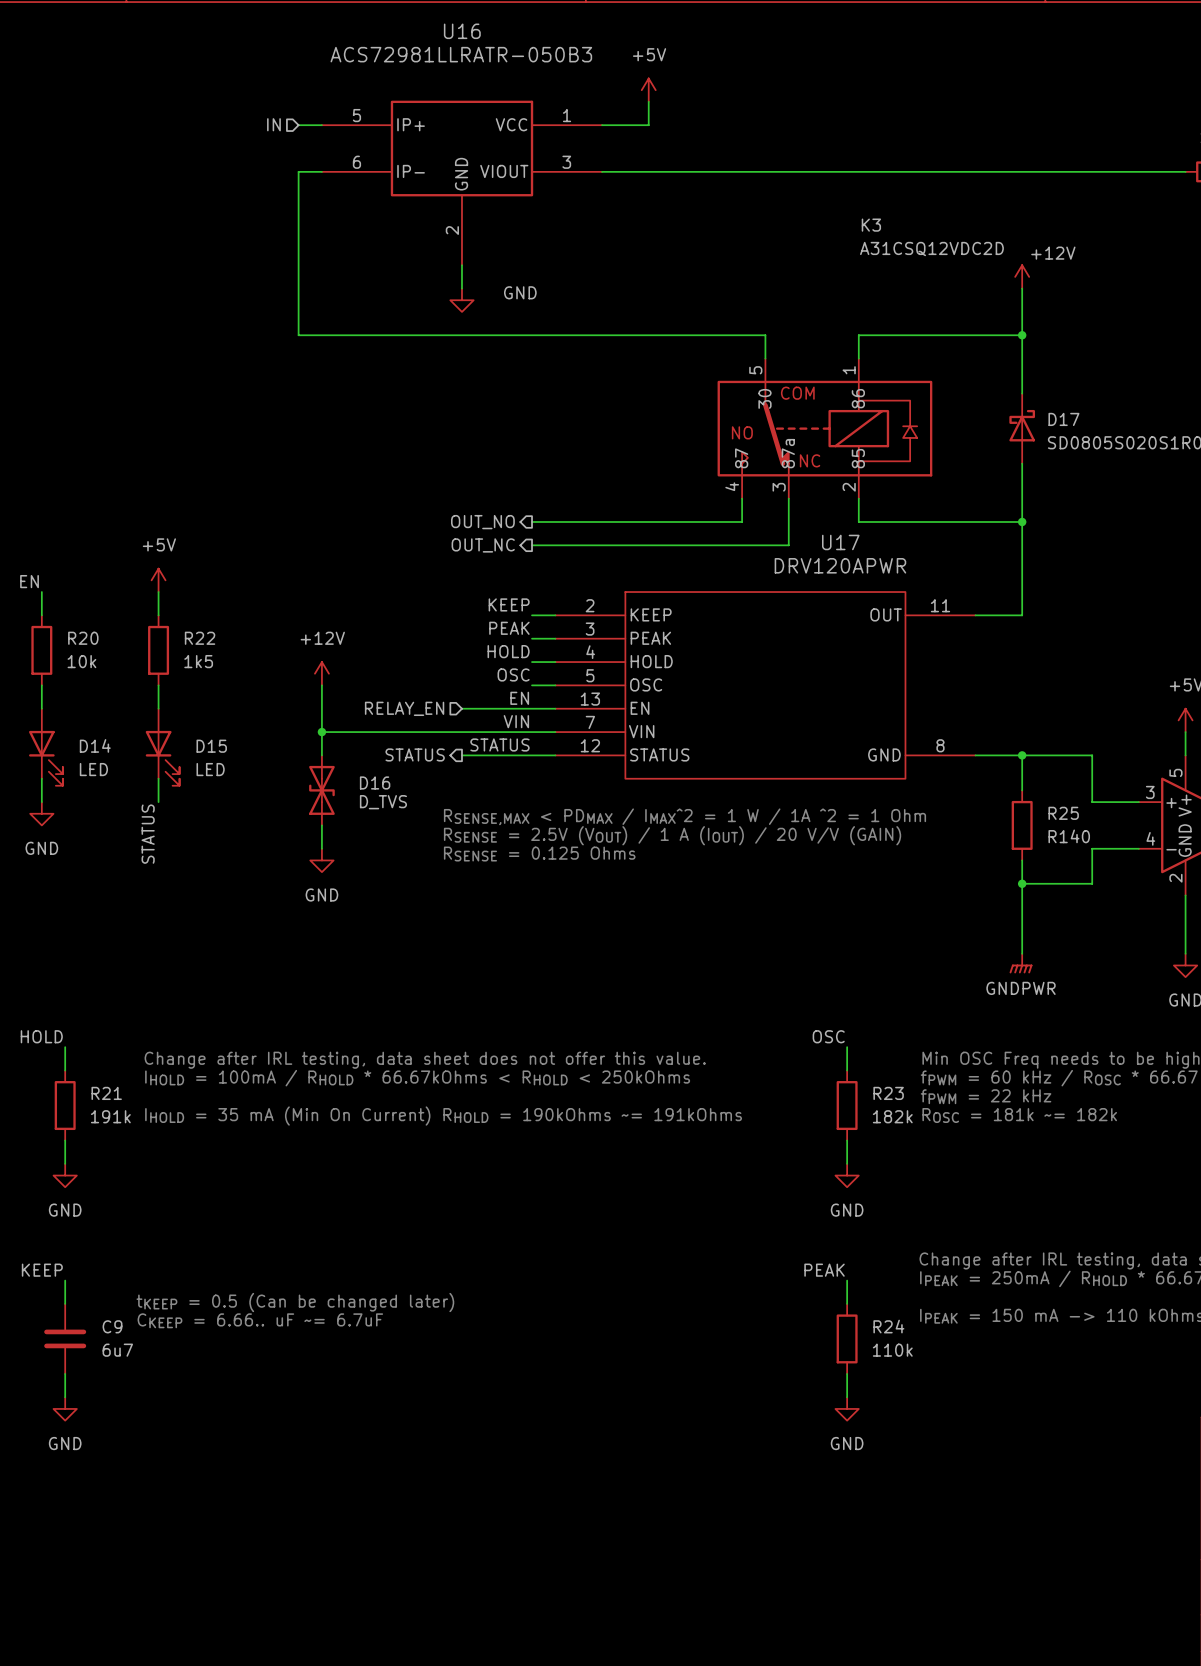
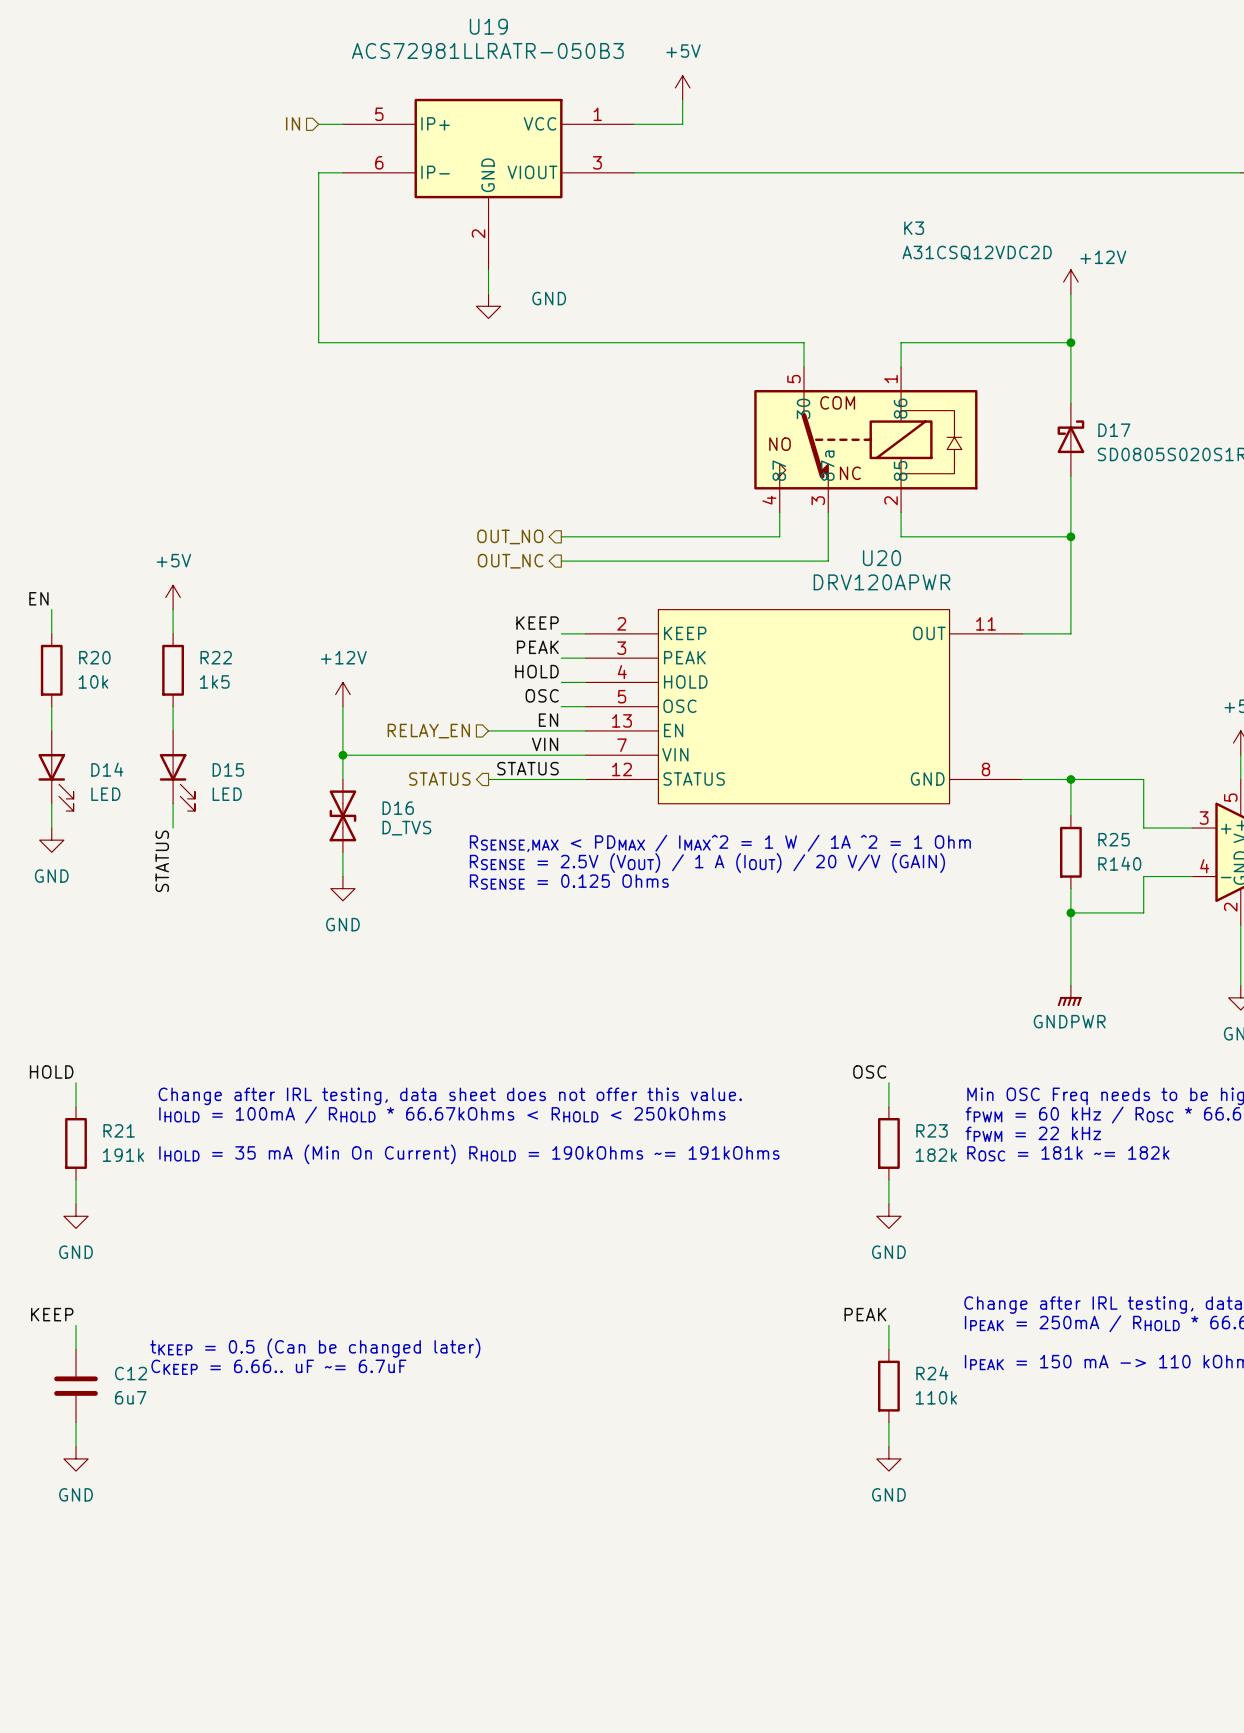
U16 name: U16 (462, 31) -> U19 (488, 26)
U17 name: U17 (840, 542) -> U20 (881, 558)
C9 name: C9 (112, 1326) -> C12 (130, 1373)

